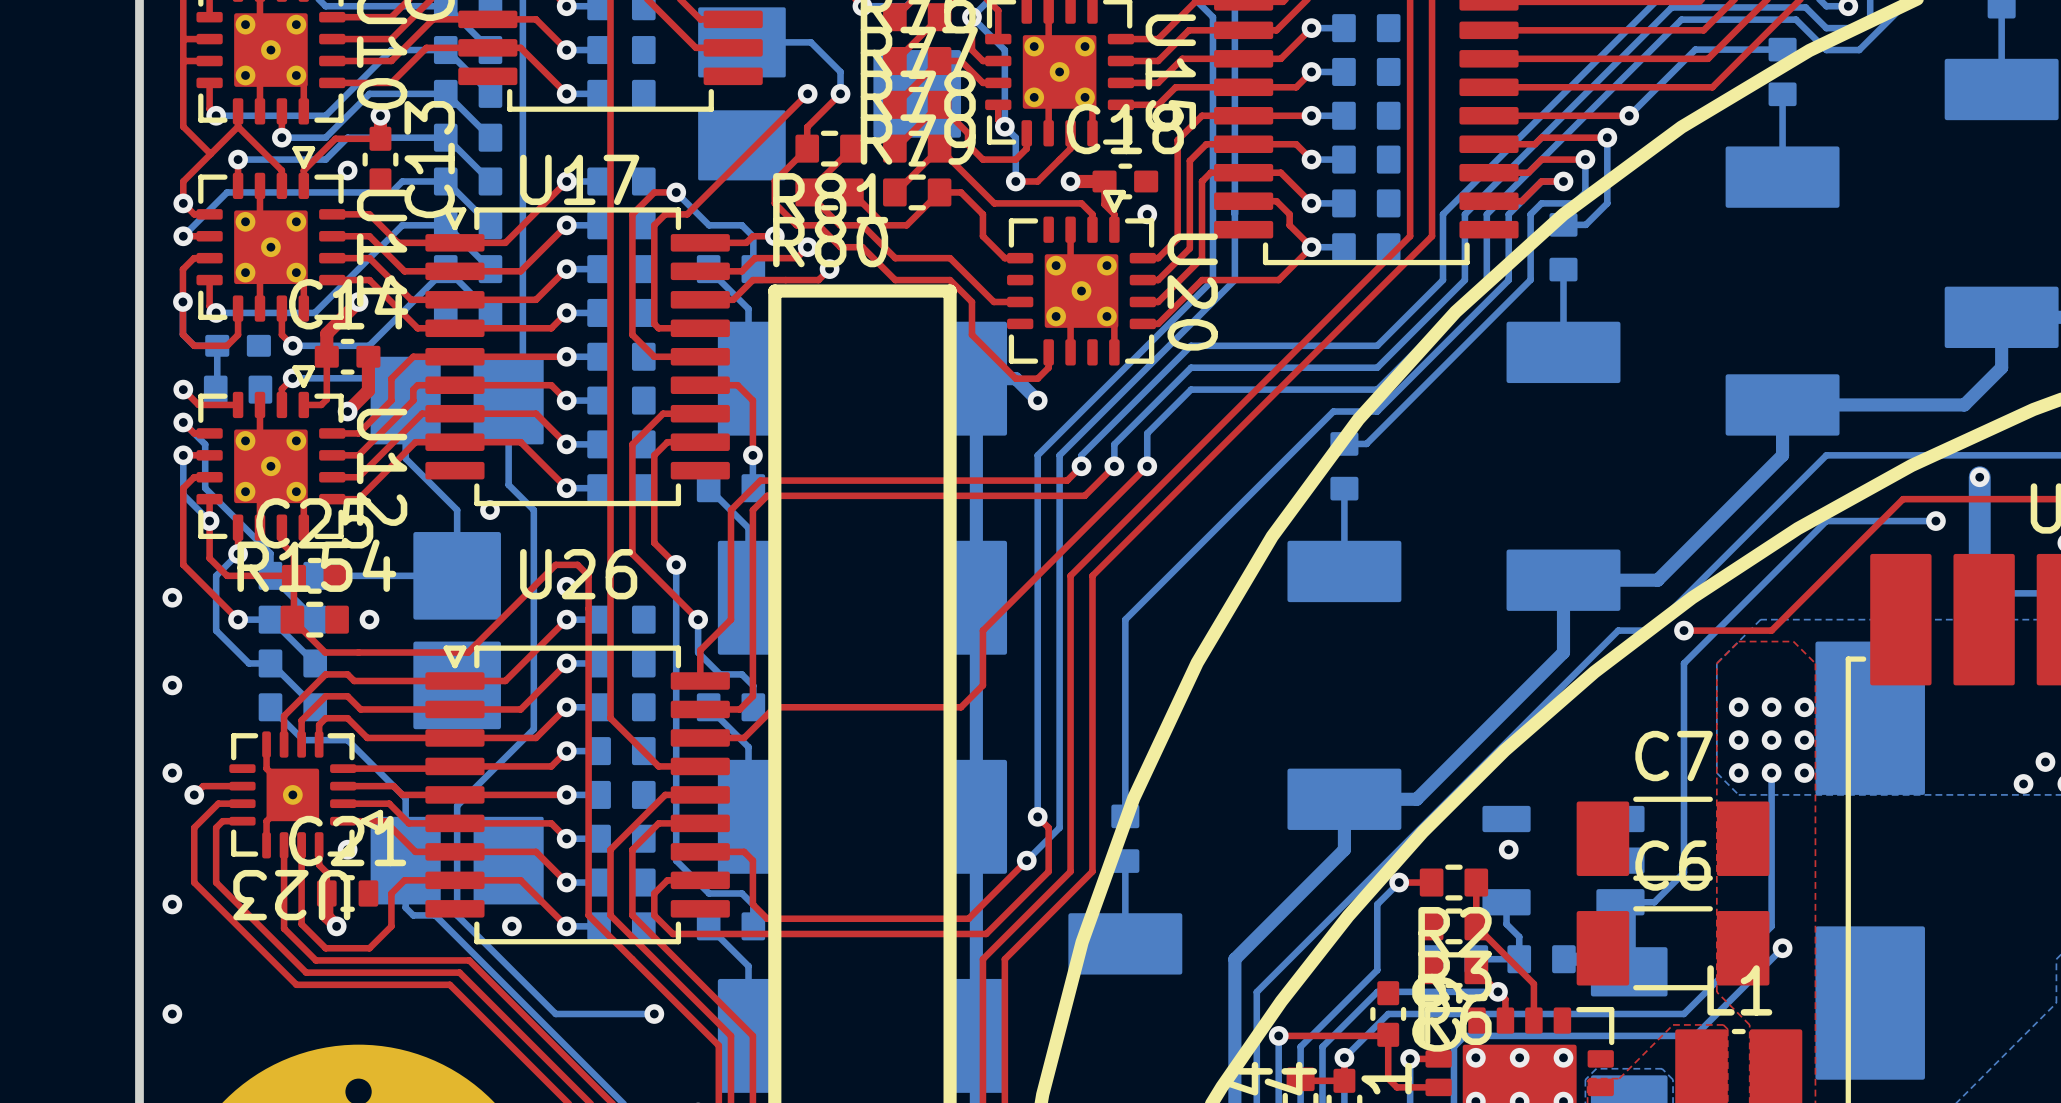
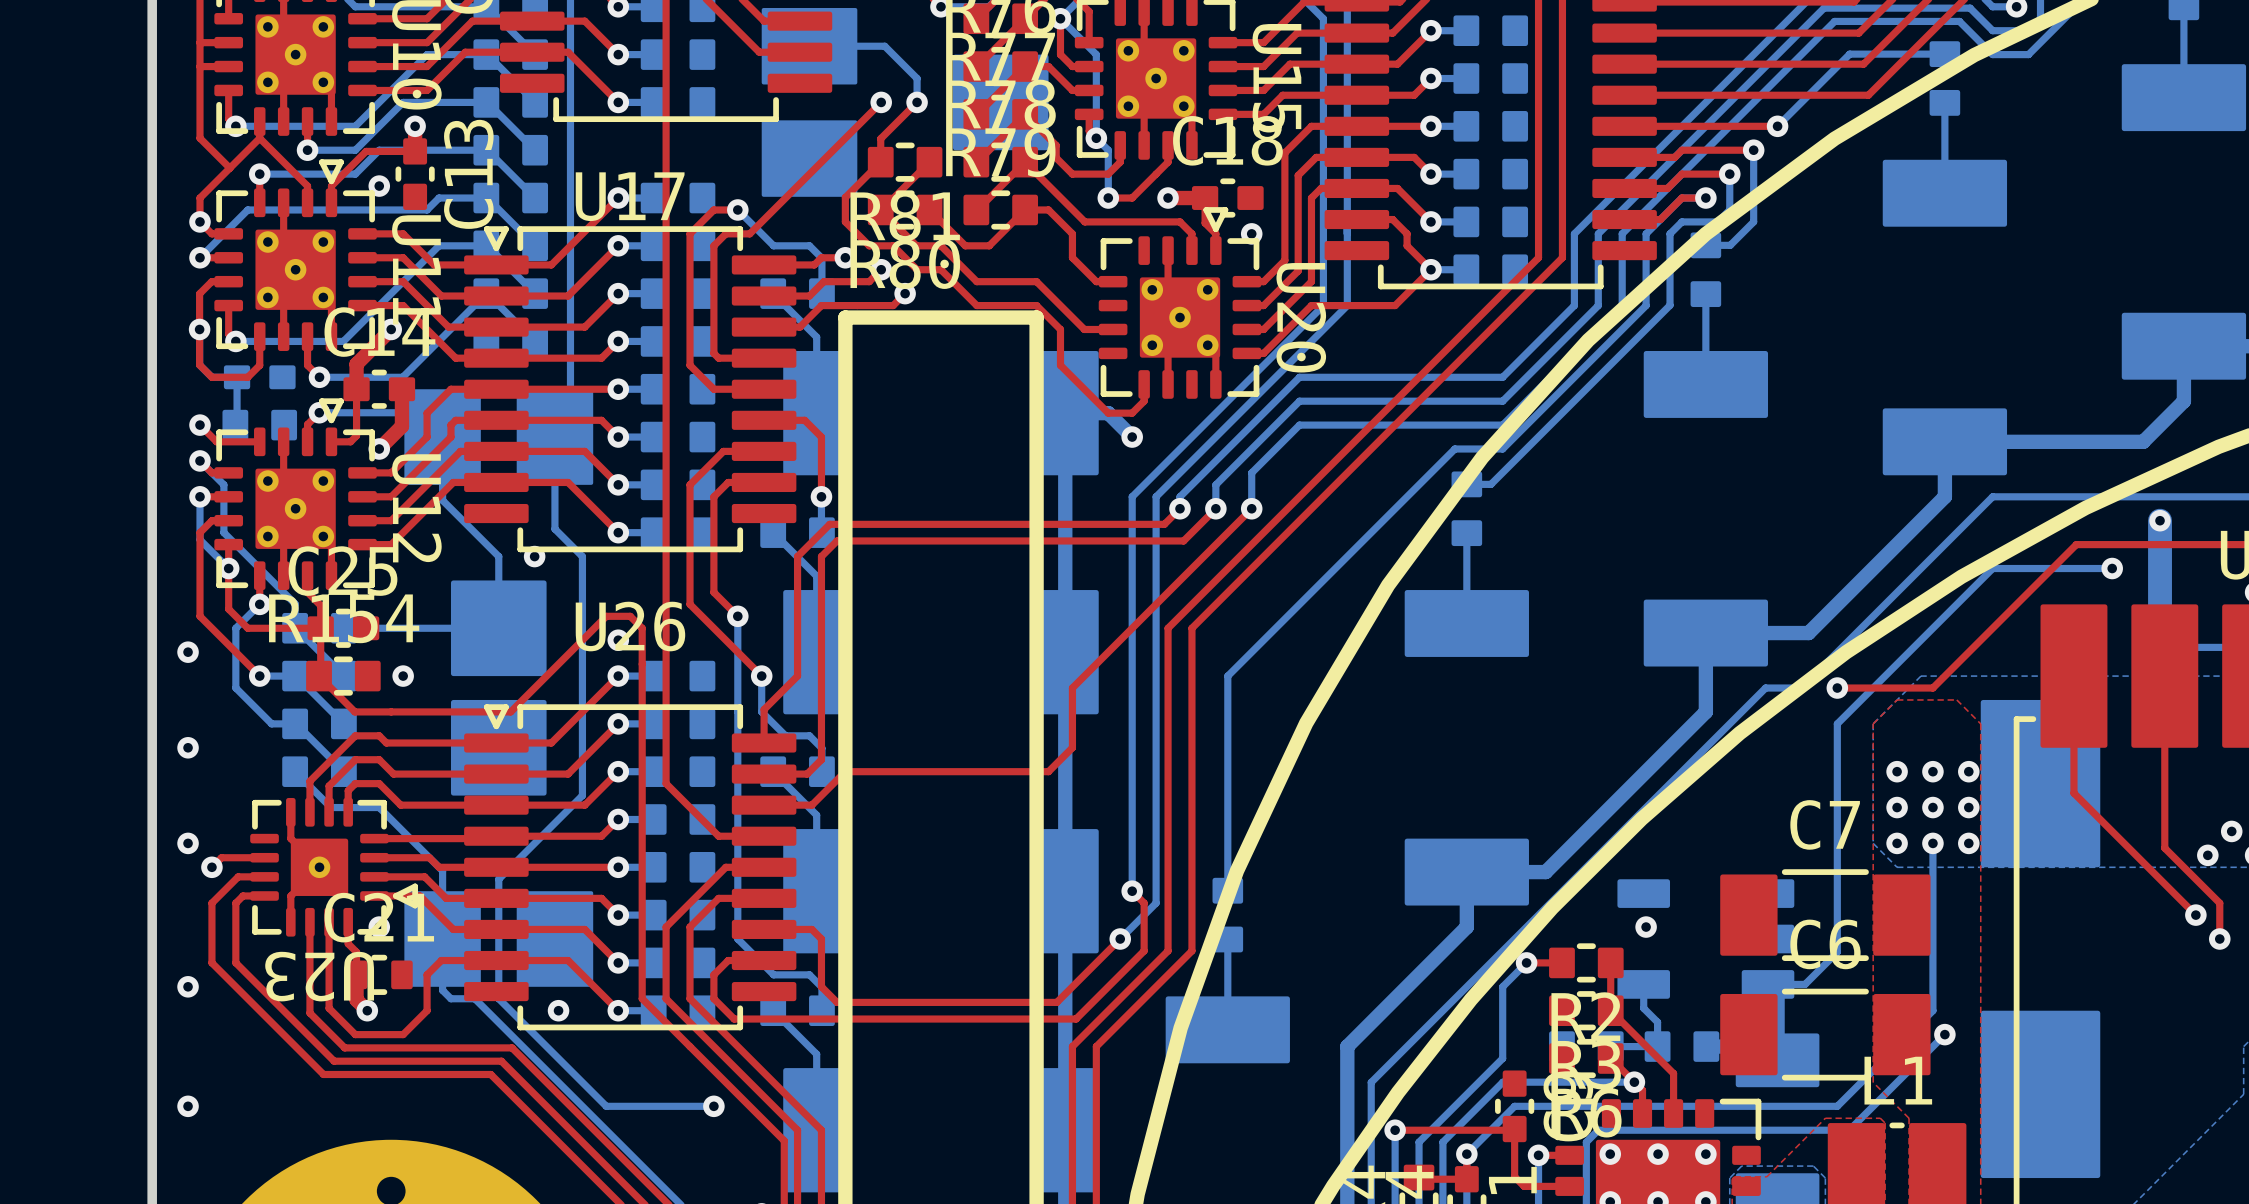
top track: none -> (2073, 676) (2073, 793) (2195, 915)
top track: none -> (2164, 676) (2164, 848) (2219, 903) (2219, 939)
via: none -> (2195, 915)
via: none -> (2219, 939)

